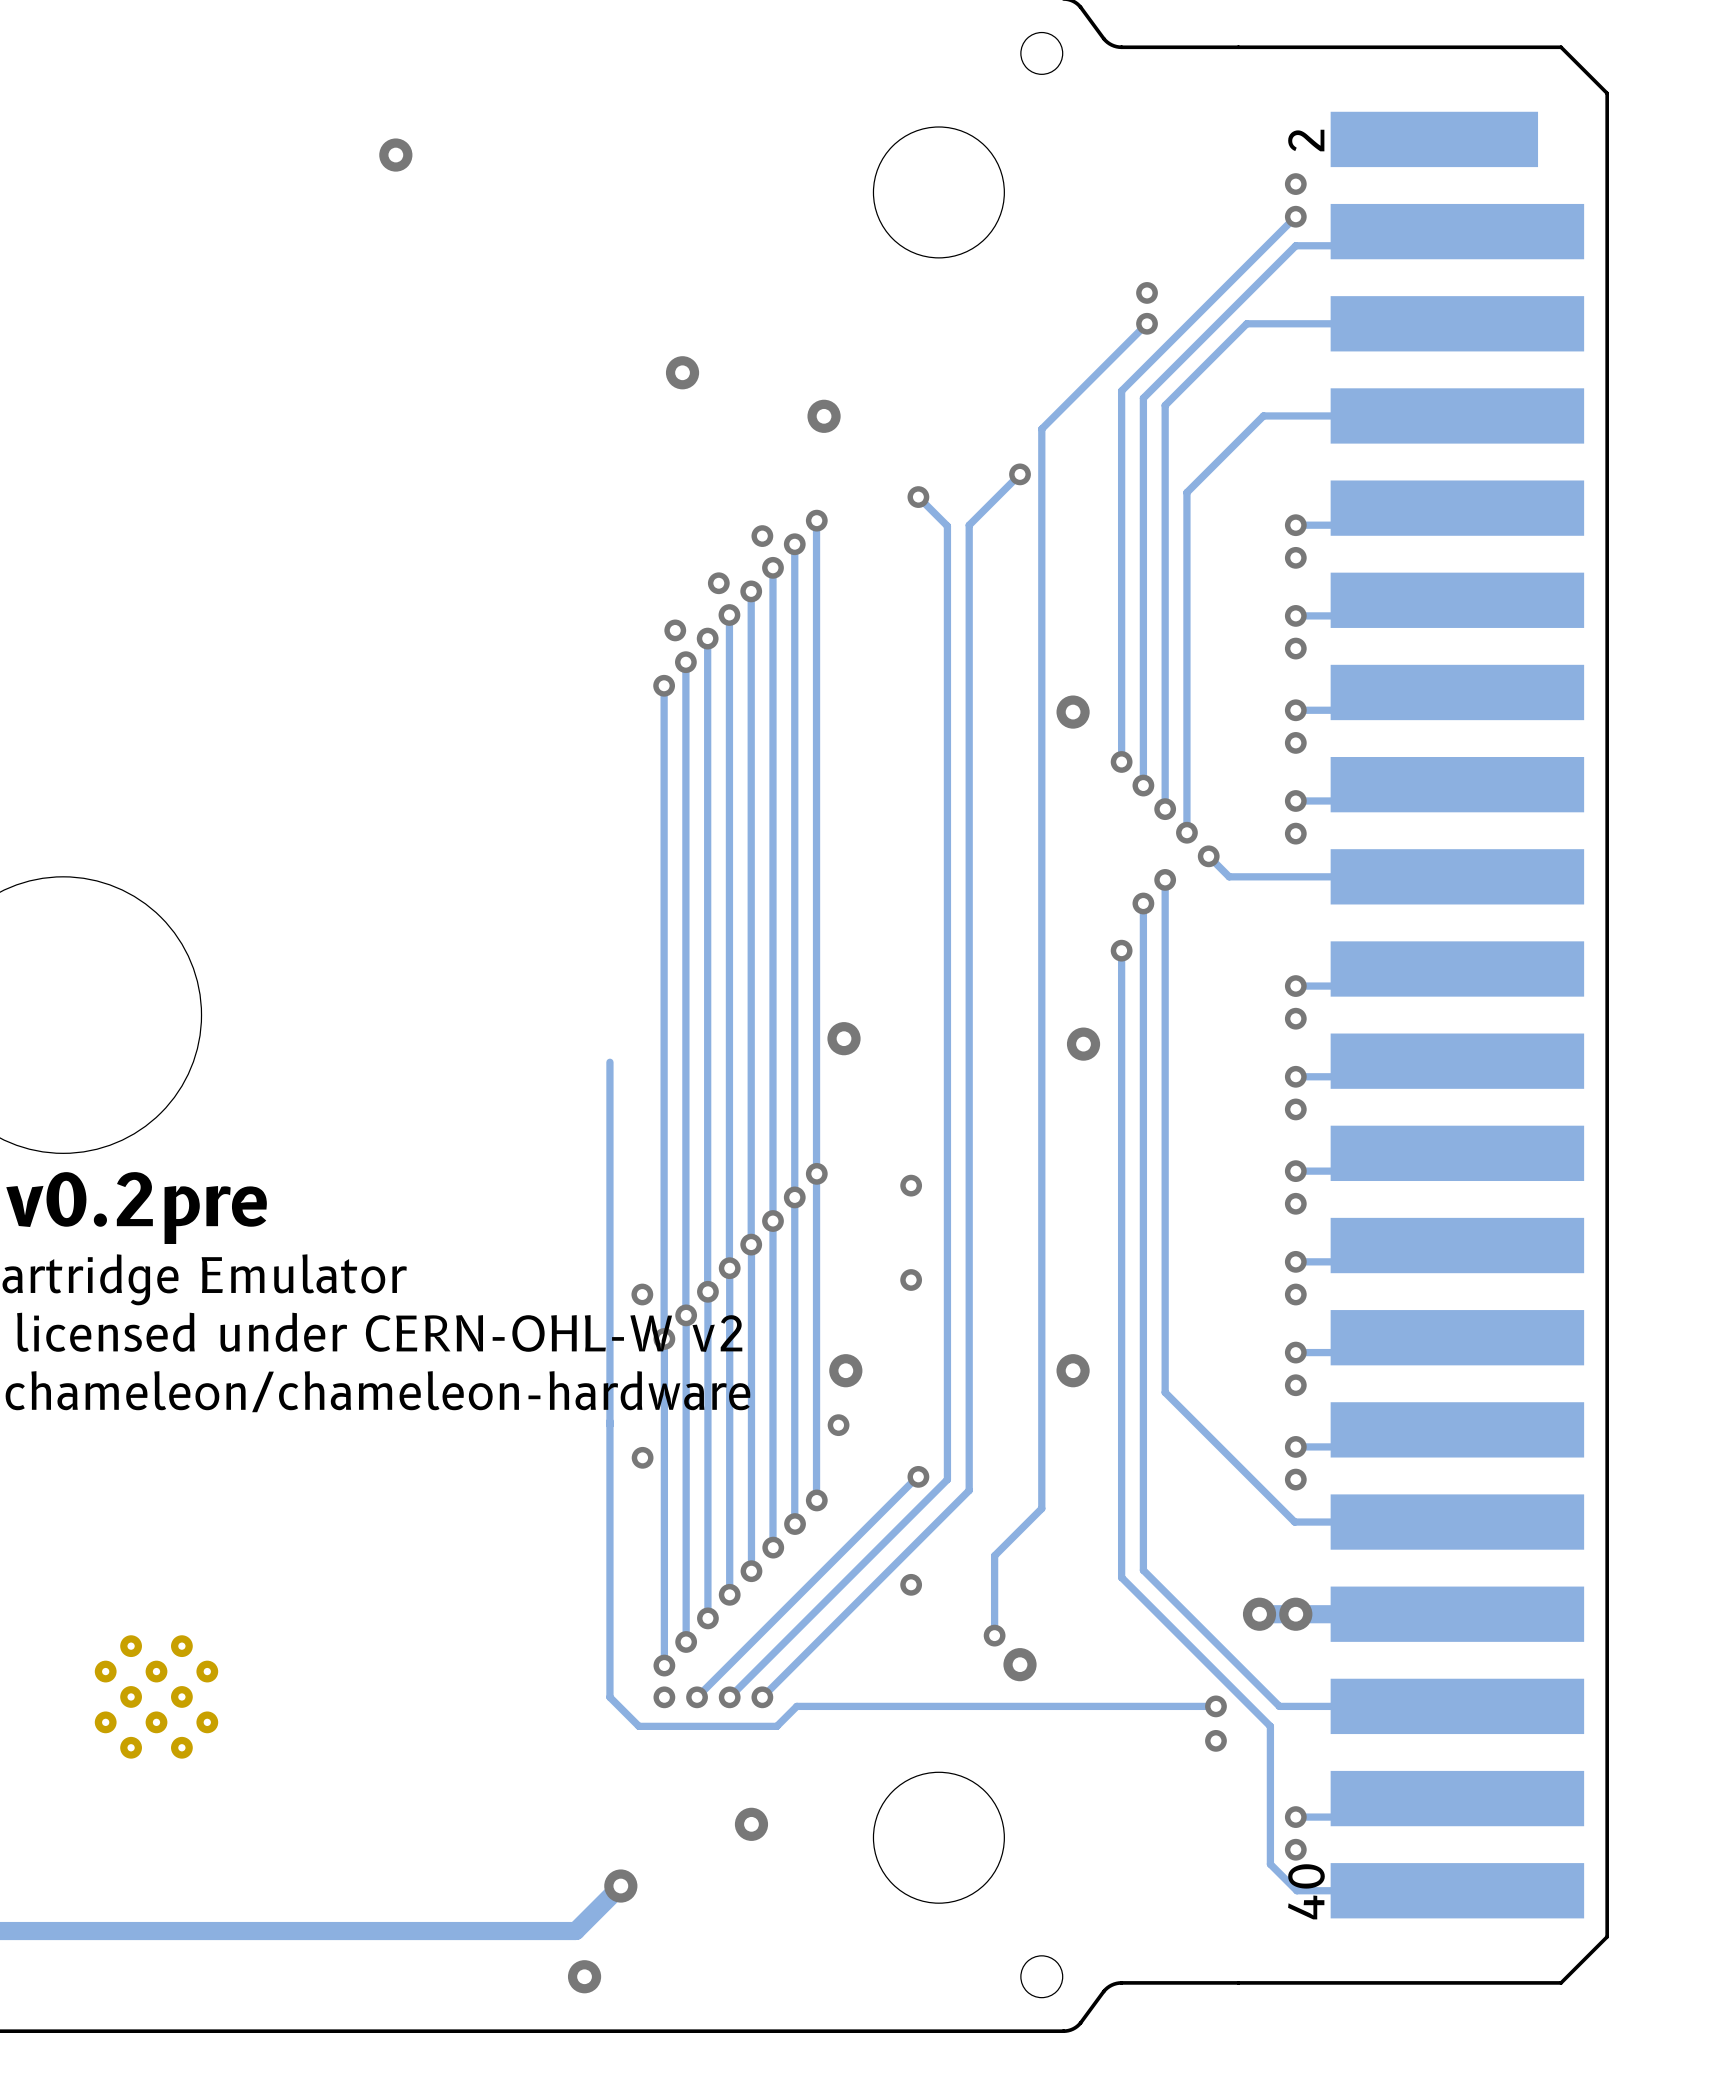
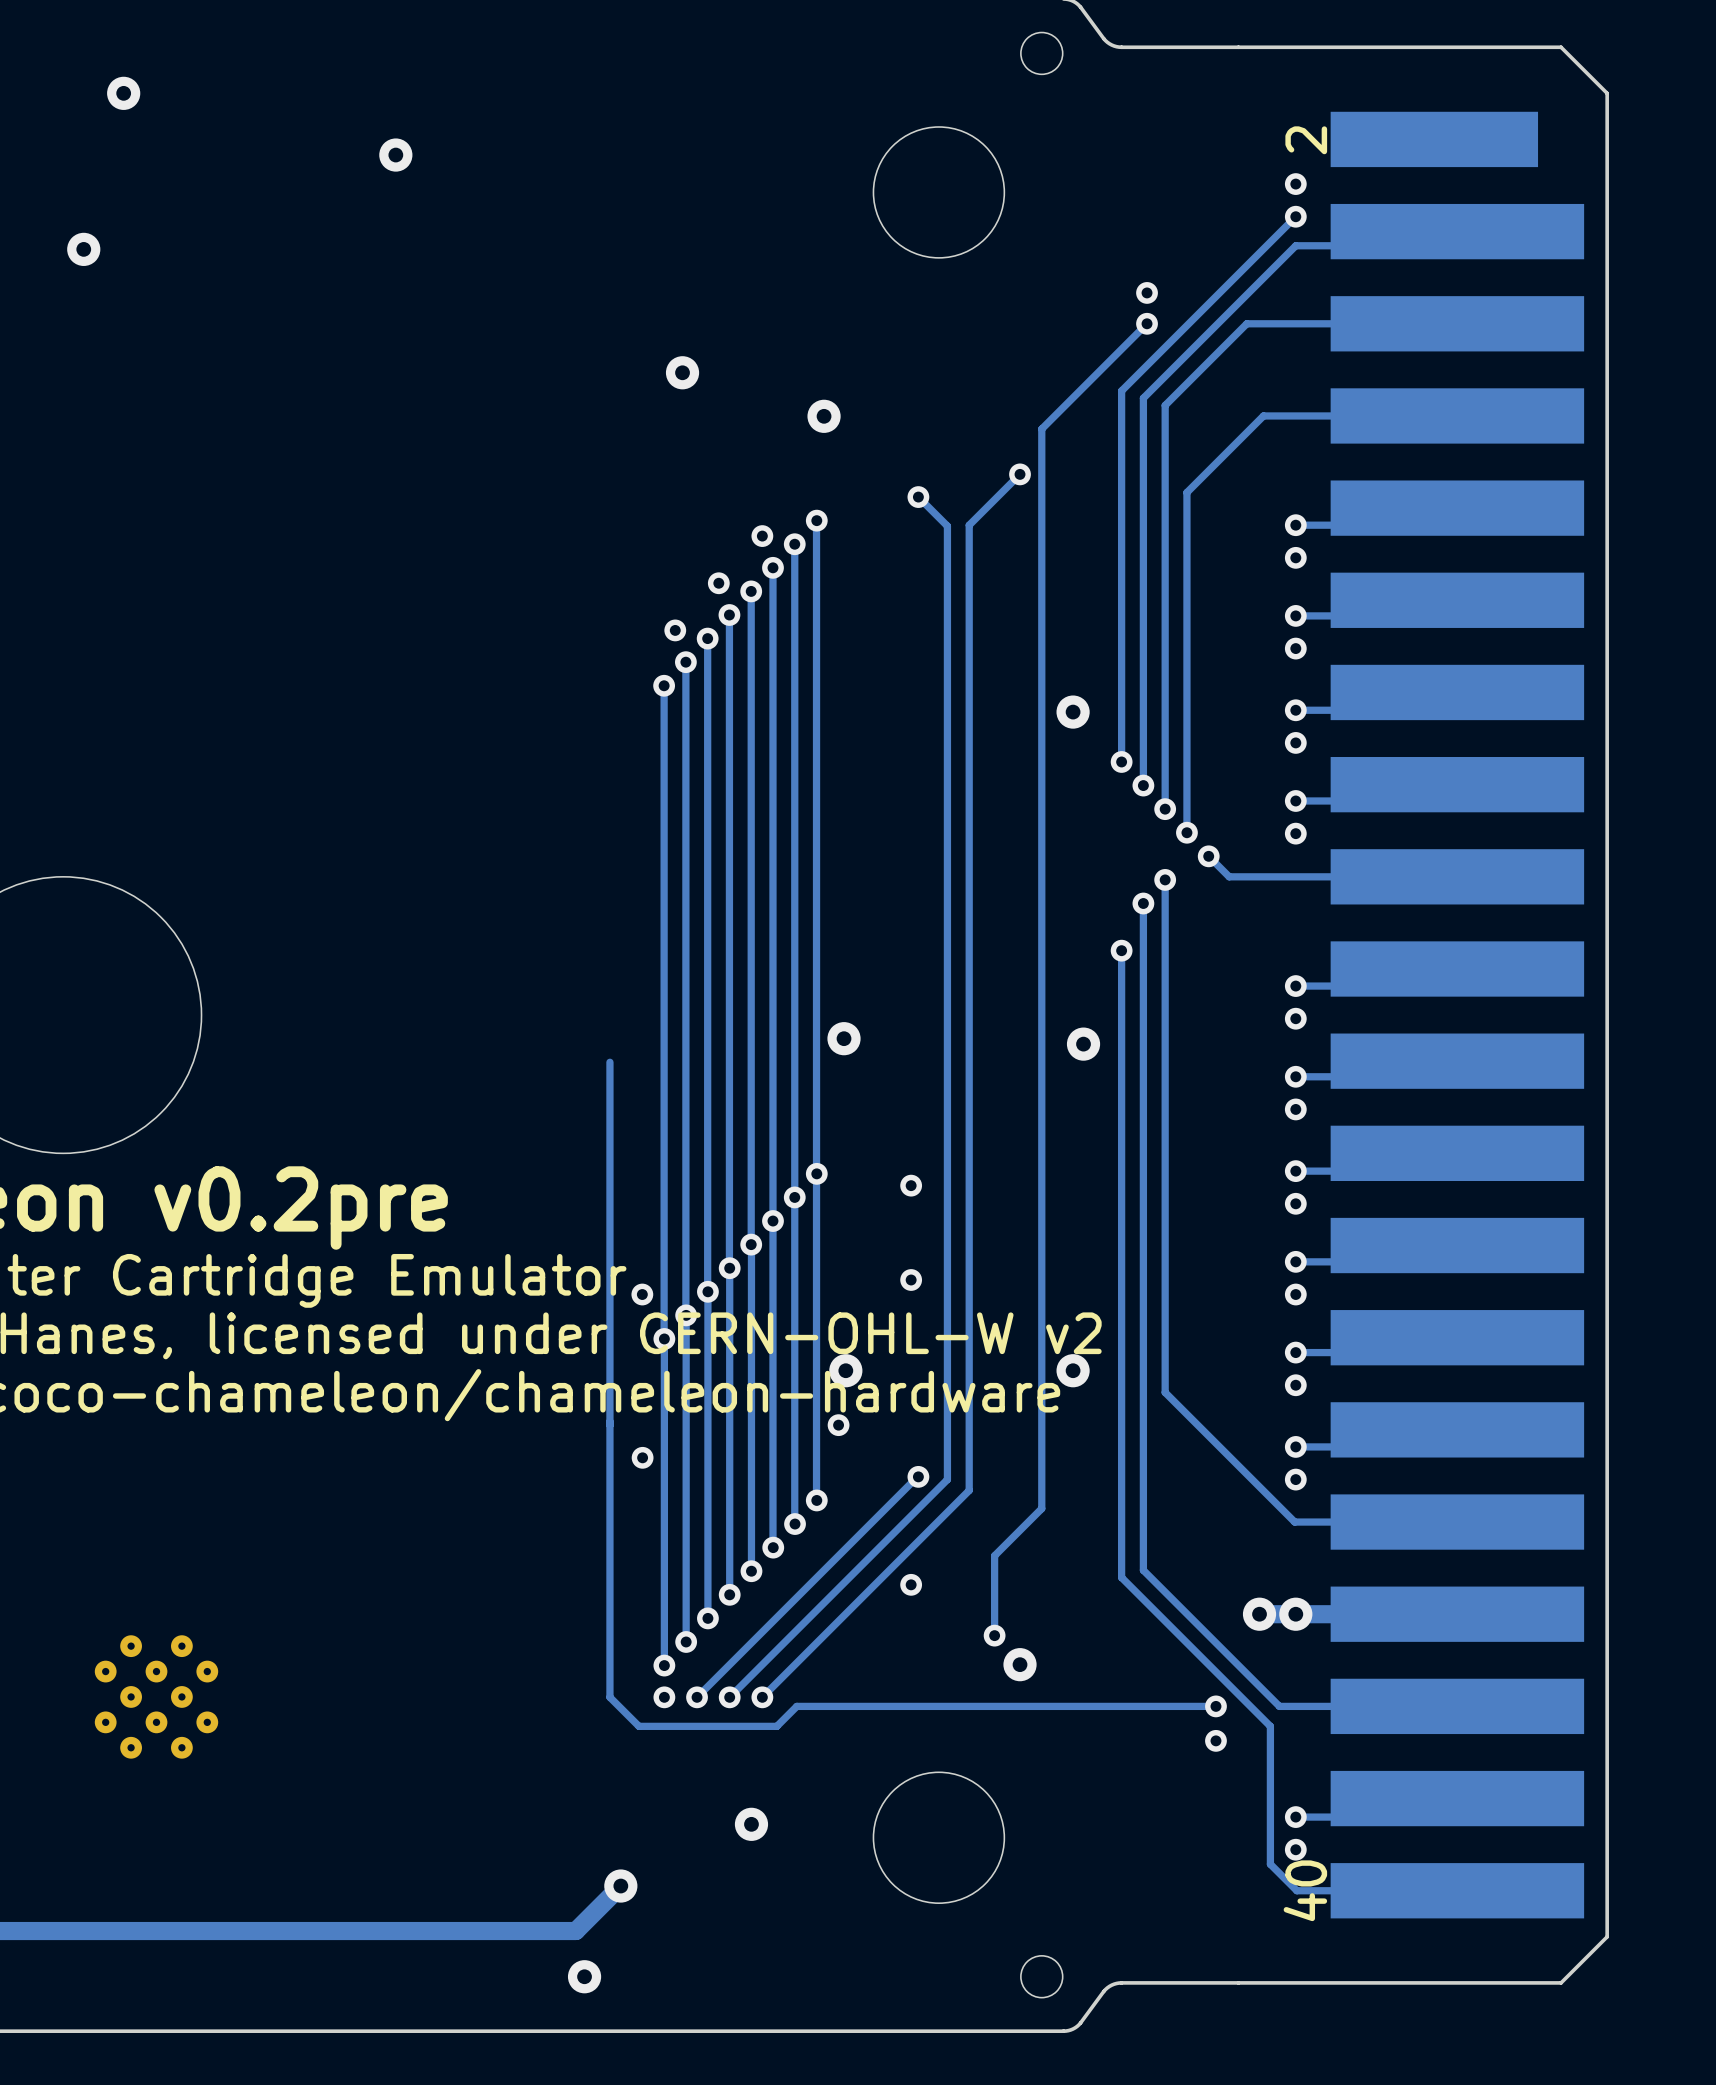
via: none -> (123, 93)
via: none -> (83, 249)

